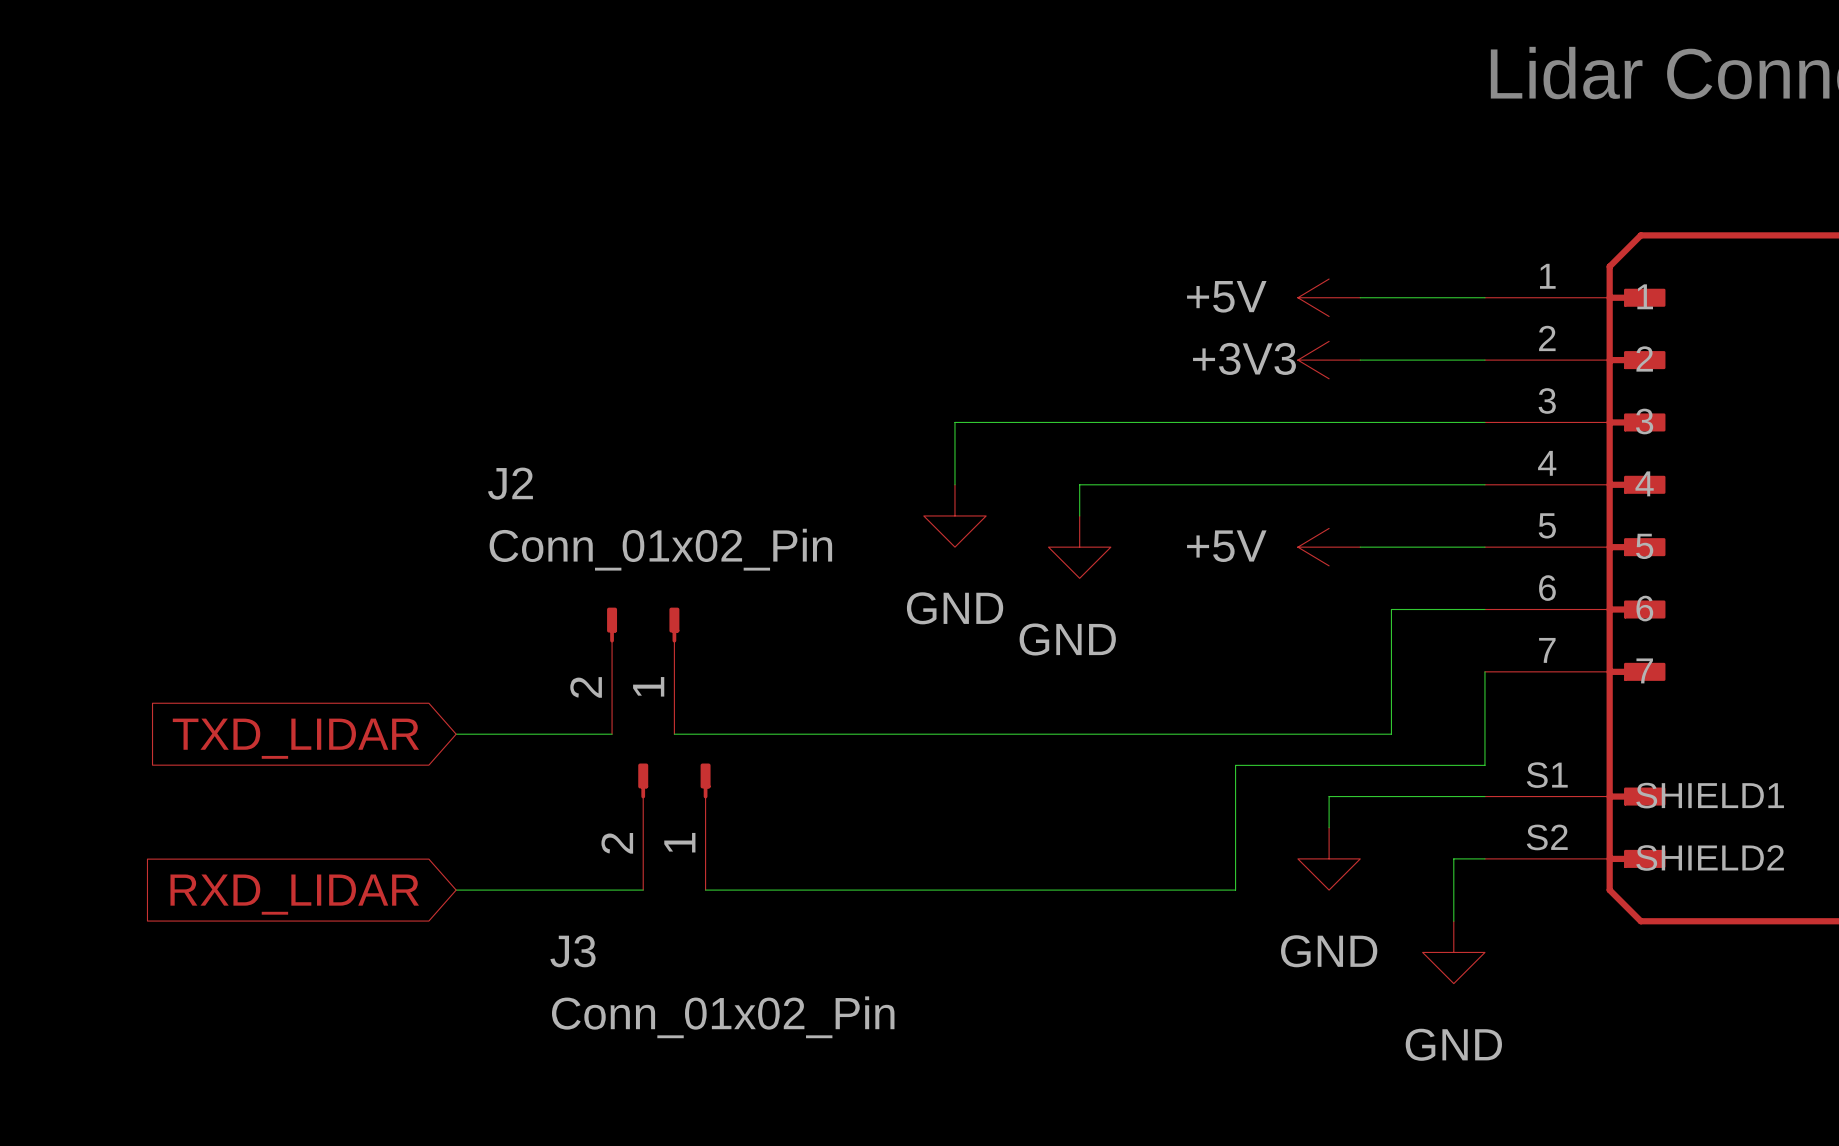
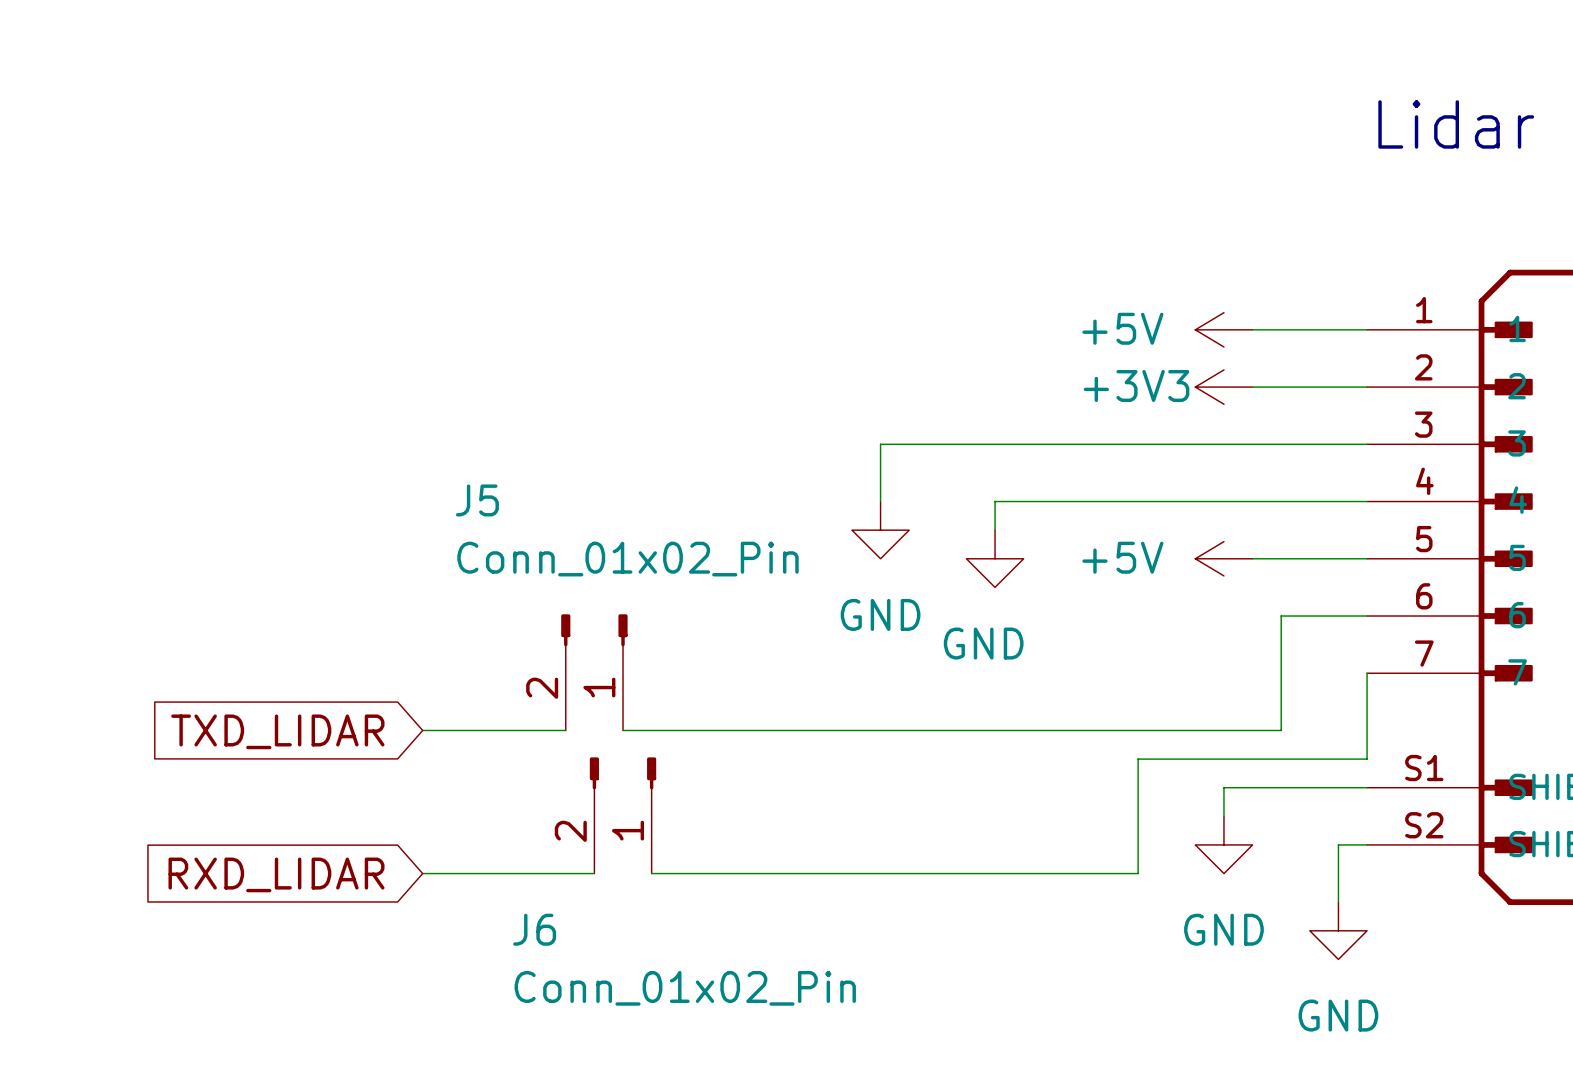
J2 name: J2 (510, 483) -> J5 (477, 500)
J3 name: J3 (572, 951) -> J6 (534, 929)

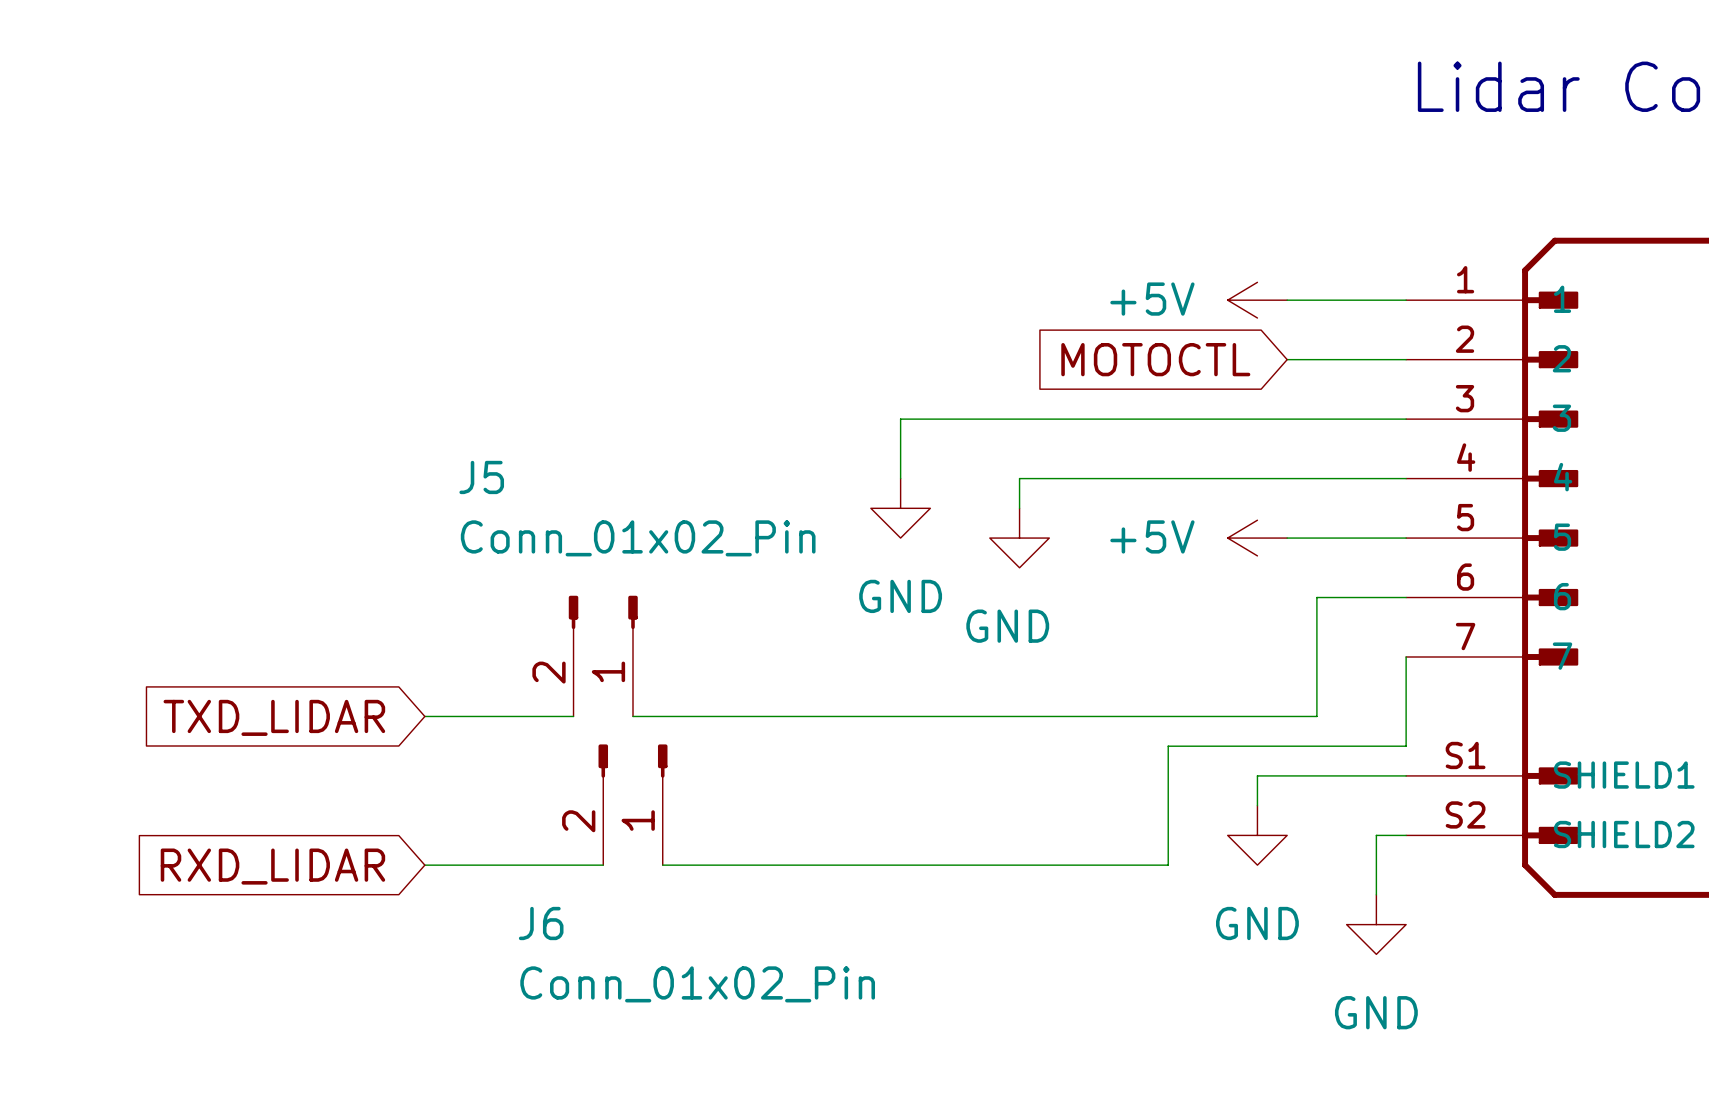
global label: none -> MOTOCTL (1155, 359)
power symbol: +3V3 (1223, 387) -> none

